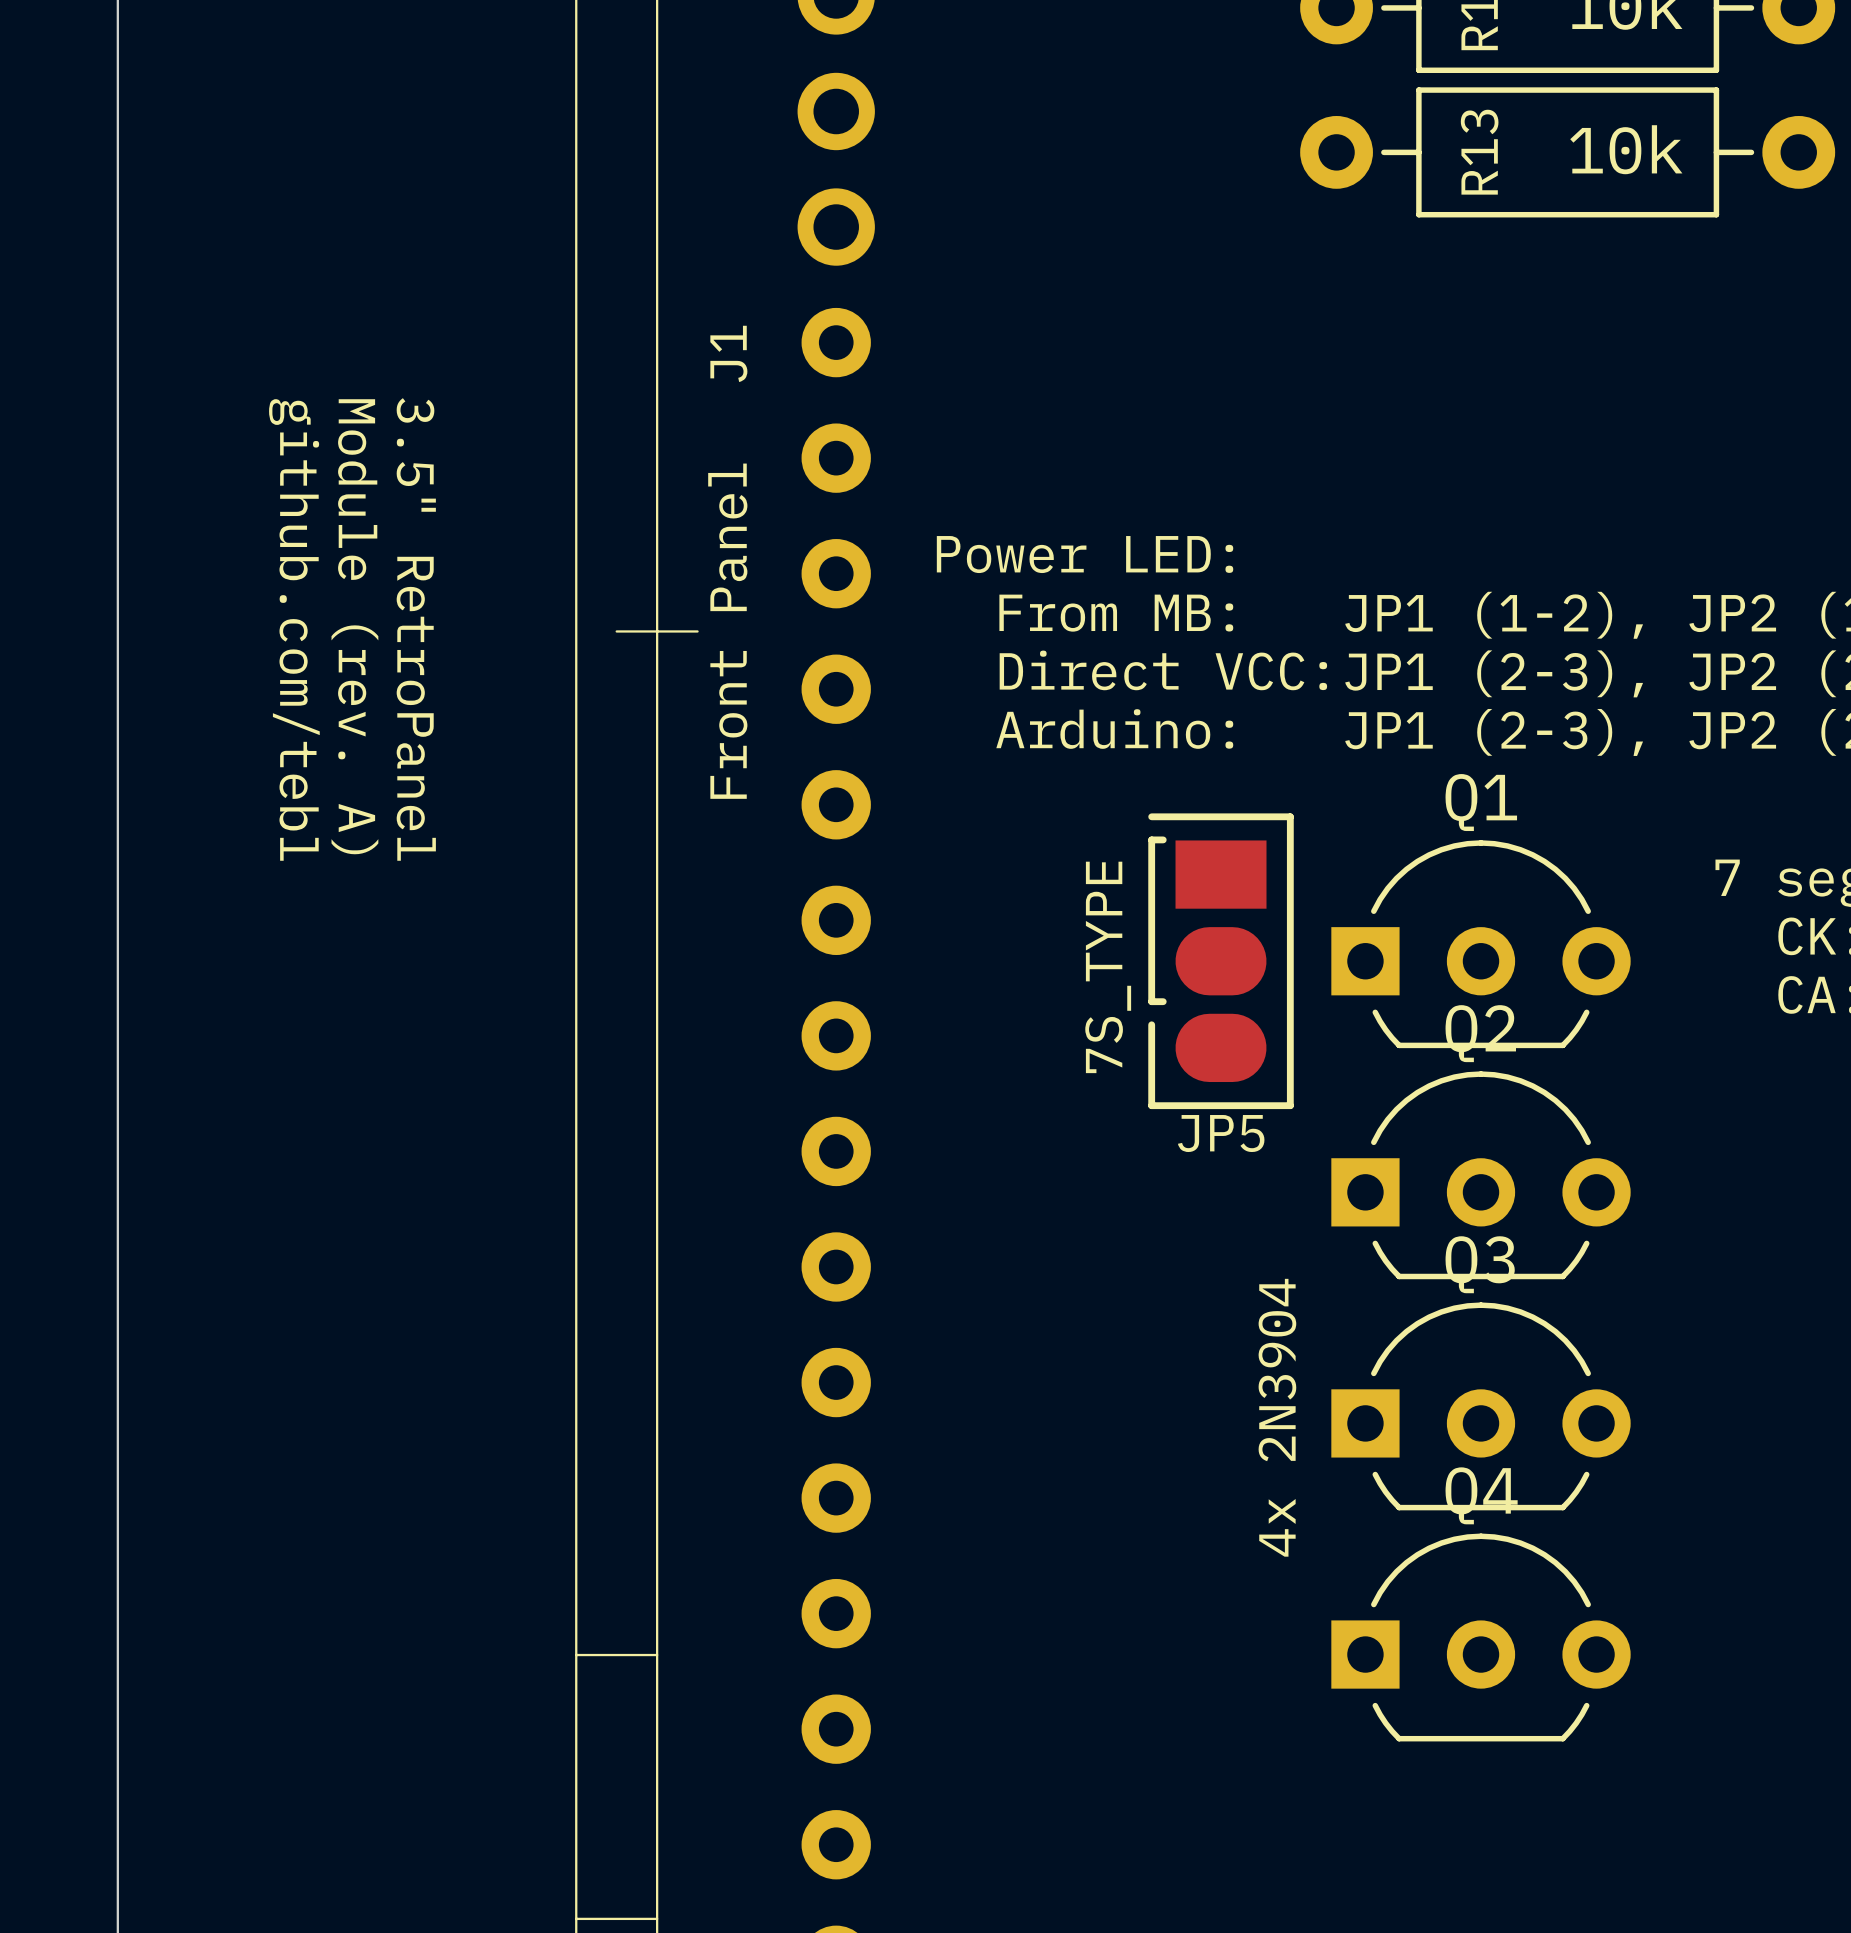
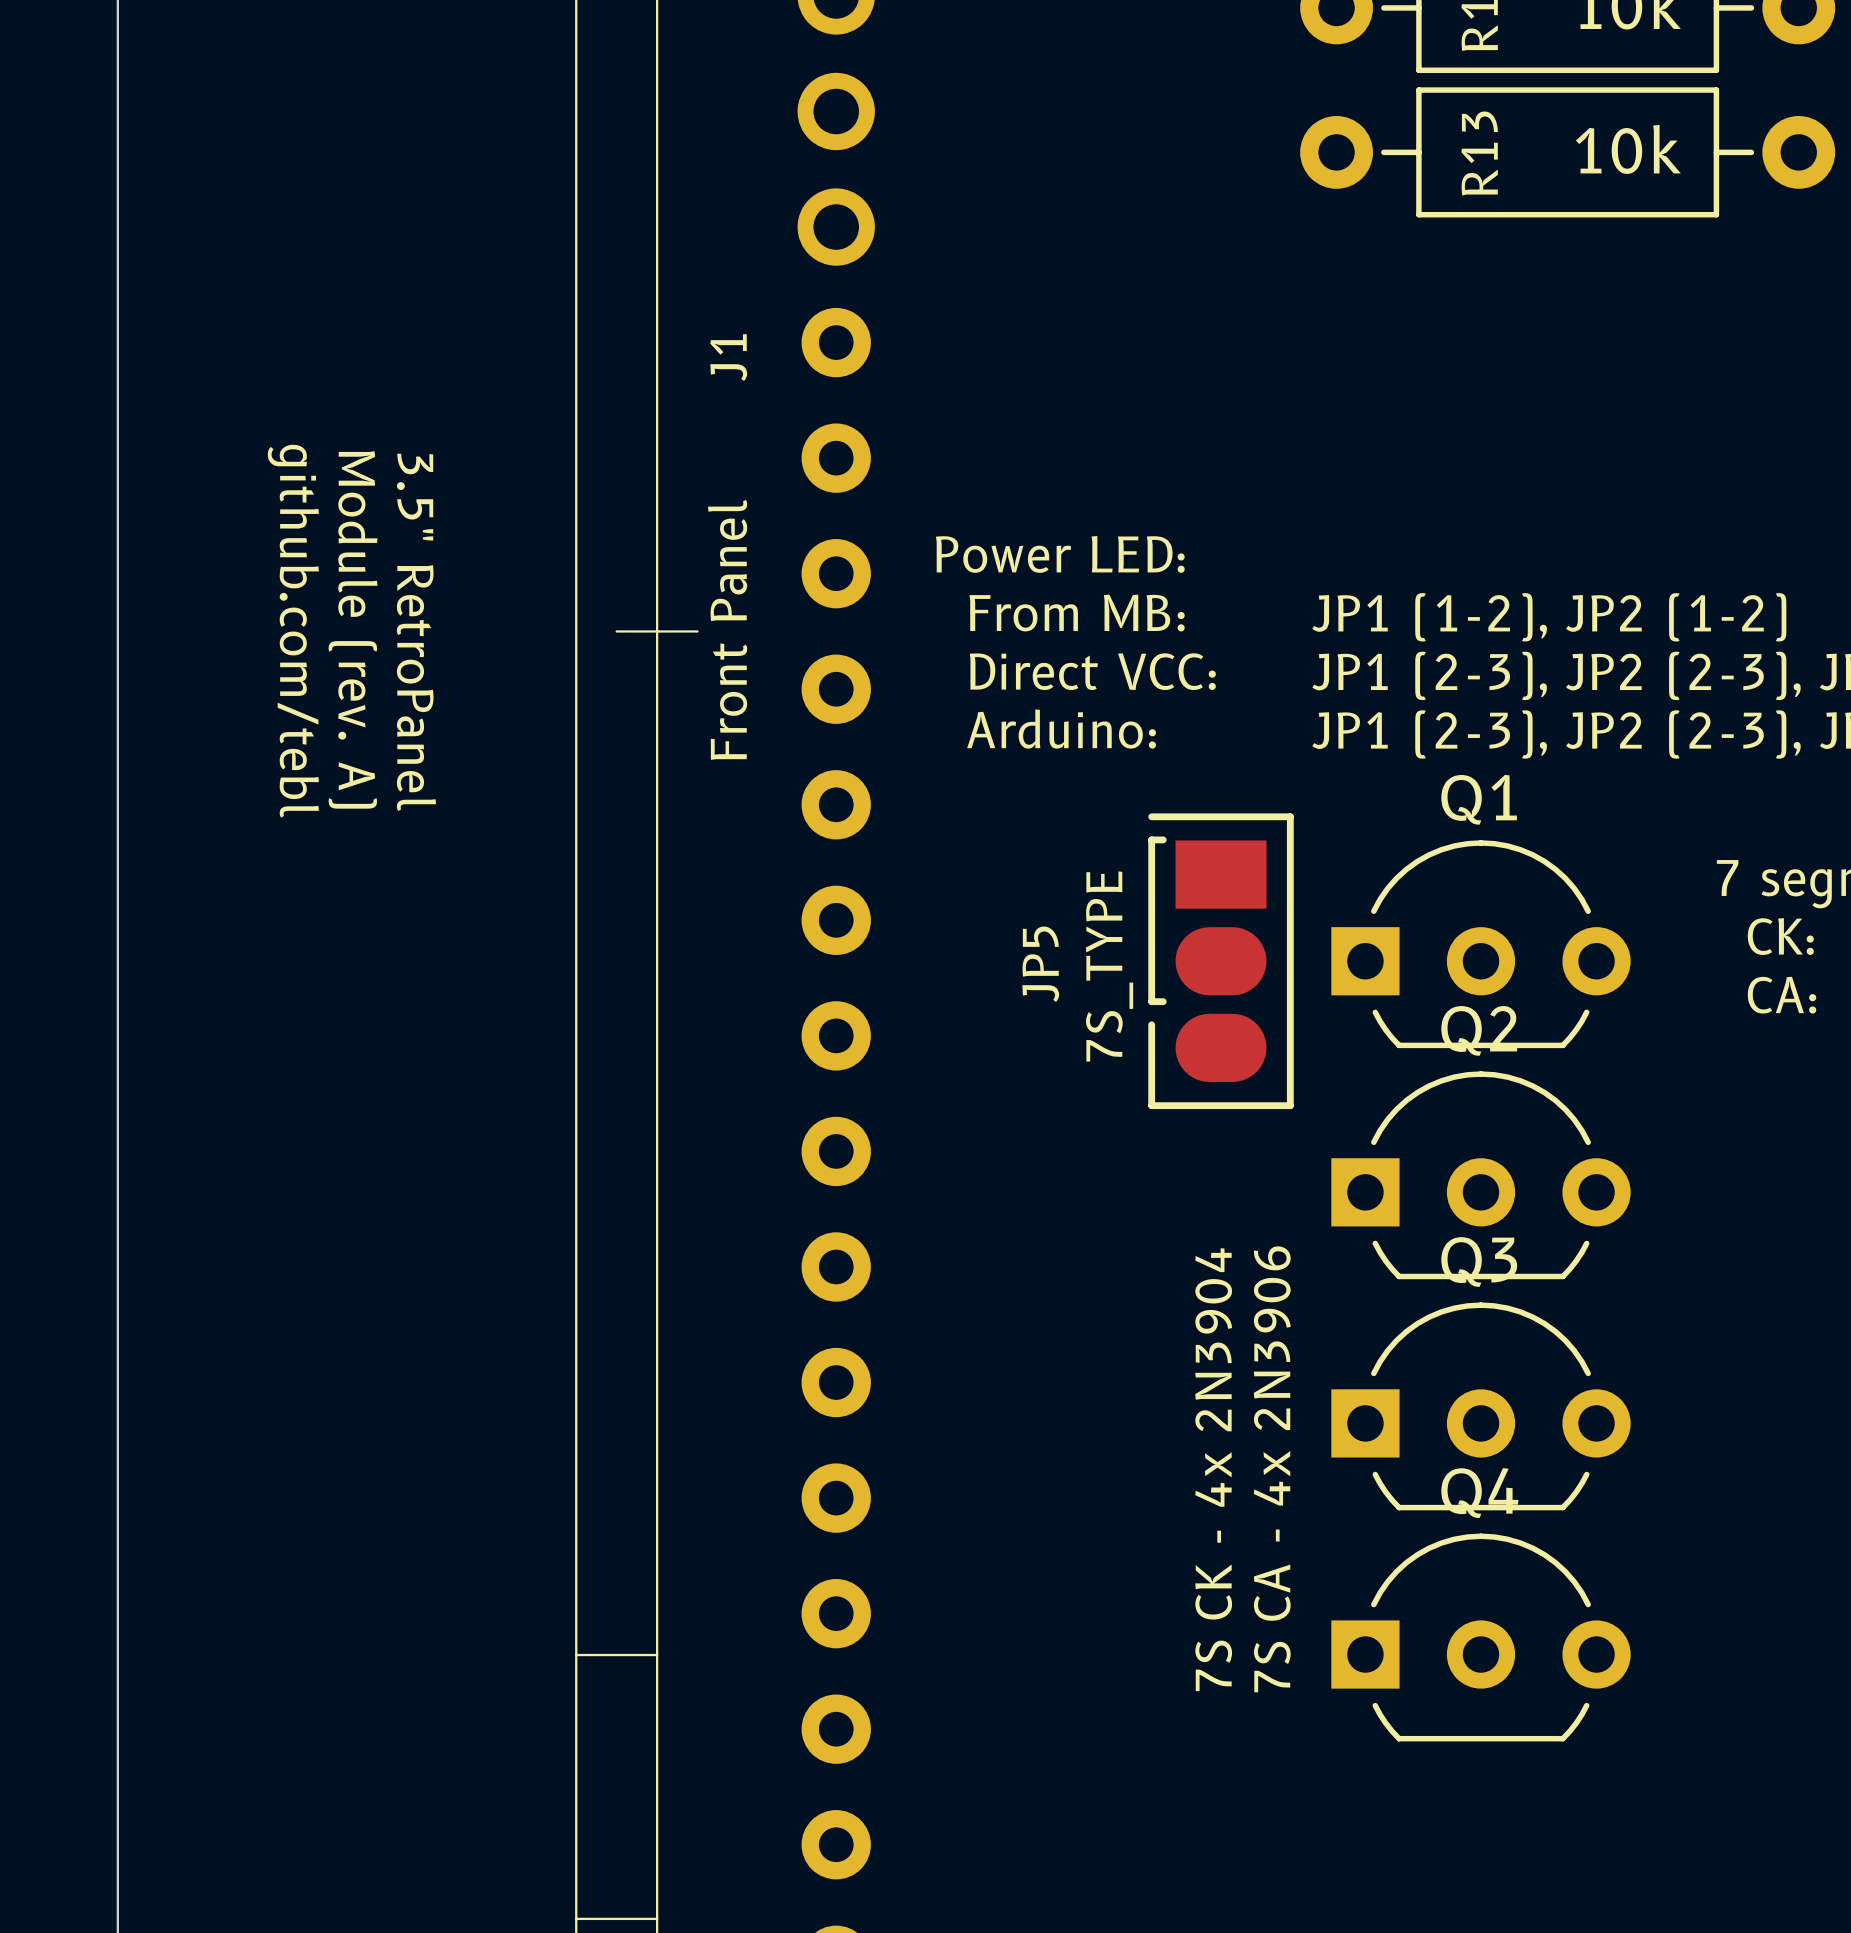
JP5 name rotation: 0° (1221, 1133) -> 90° counterclockwise (1040, 964)
JP5 name position: JP5 (1221, 1133) -> JP5 (1040, 964)
text: 4x 2N3904 (1277, 1417) -> none
text: none -> 7S CK - 4x 2N3904 (1213, 1469)
text: none -> 7S CA - 4x 2N3906 (1272, 1469)

